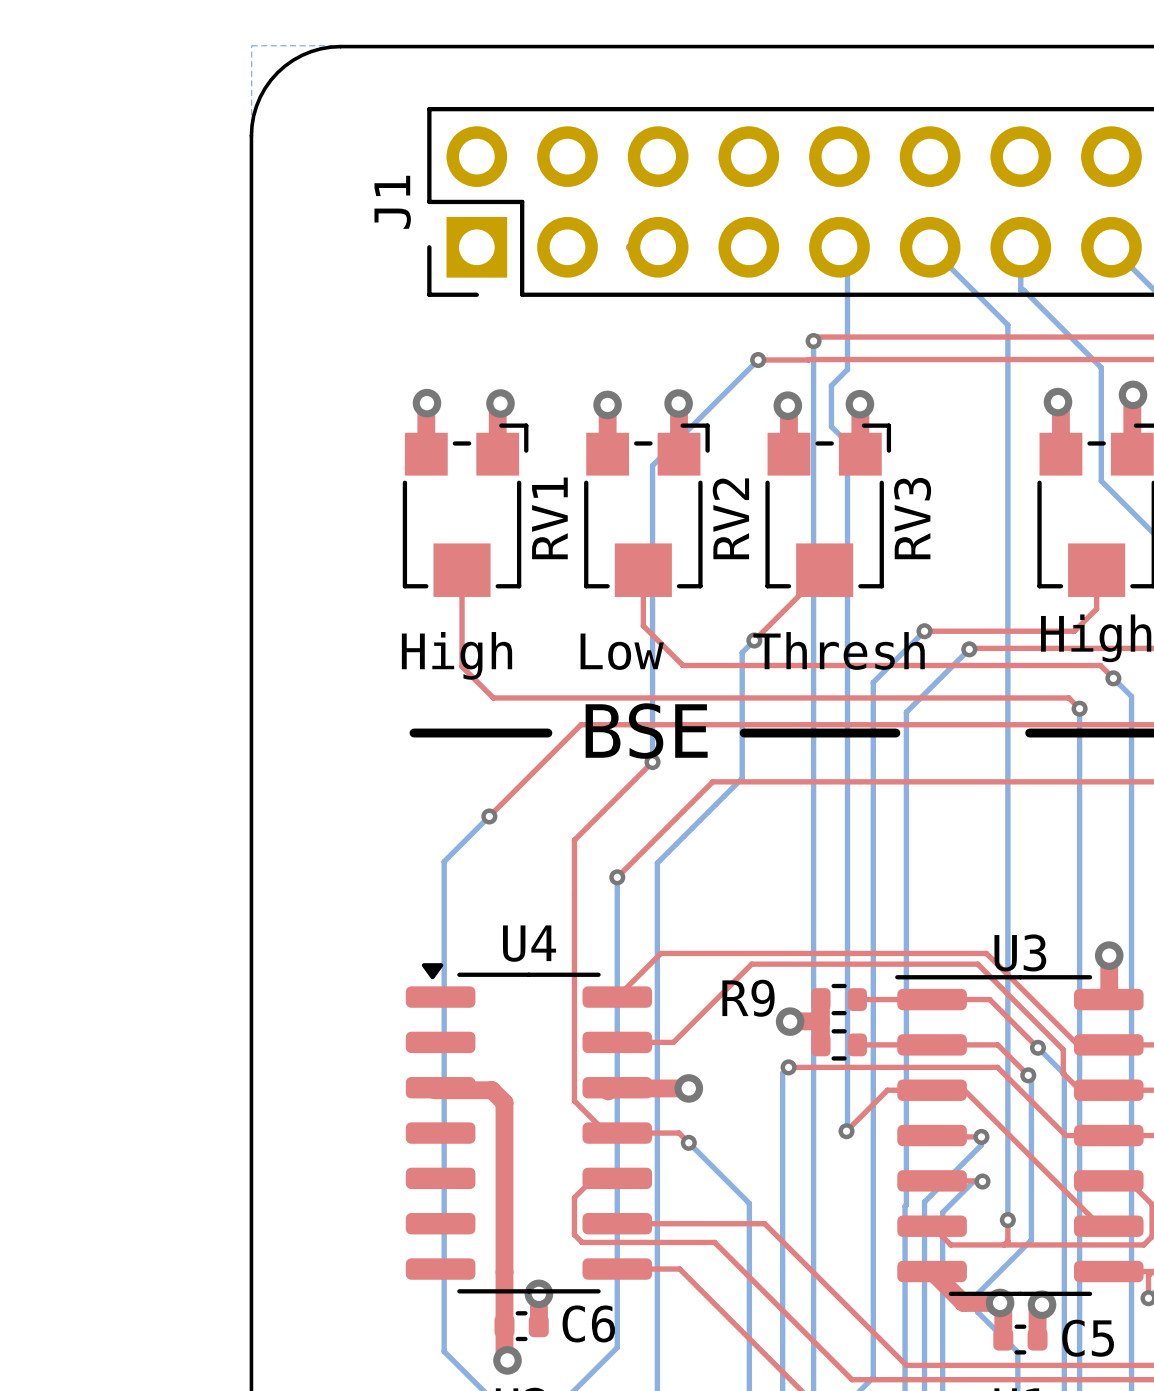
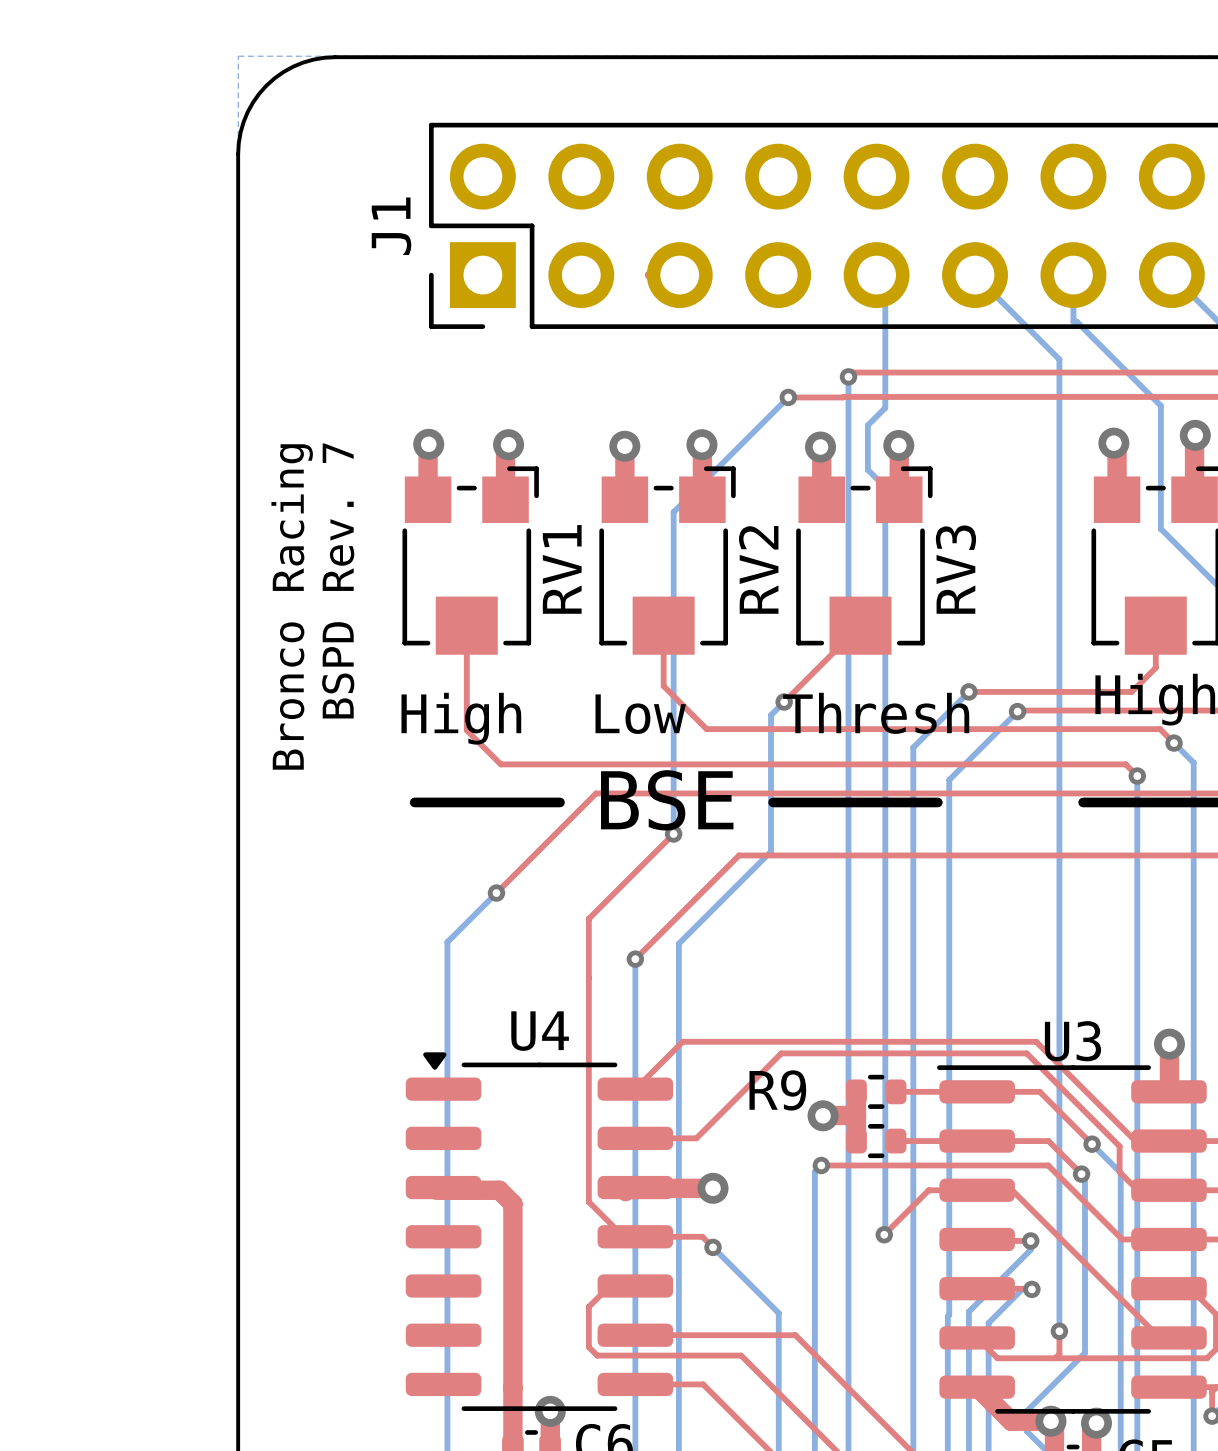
text: none -> BSPD Rev. 7 (338, 580)
text: none -> Bronco Racing (292, 606)

